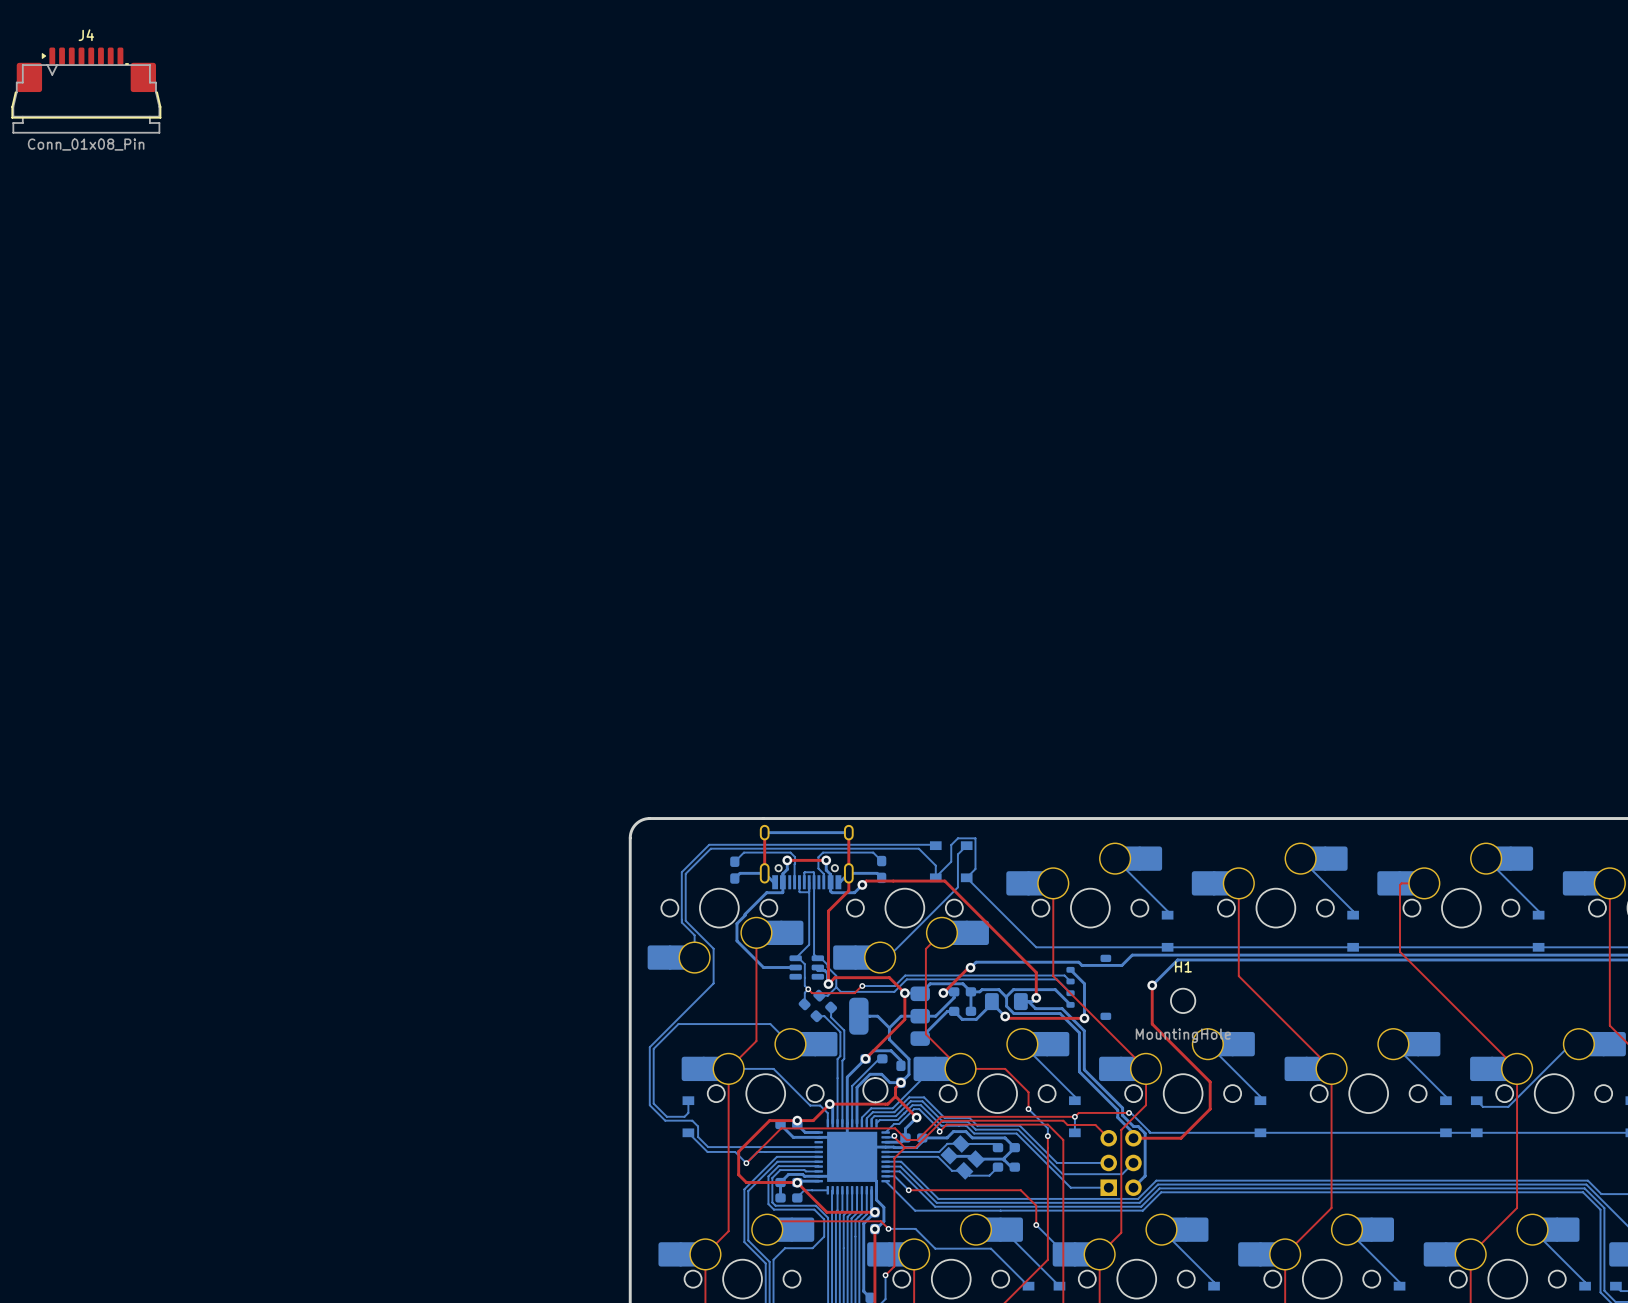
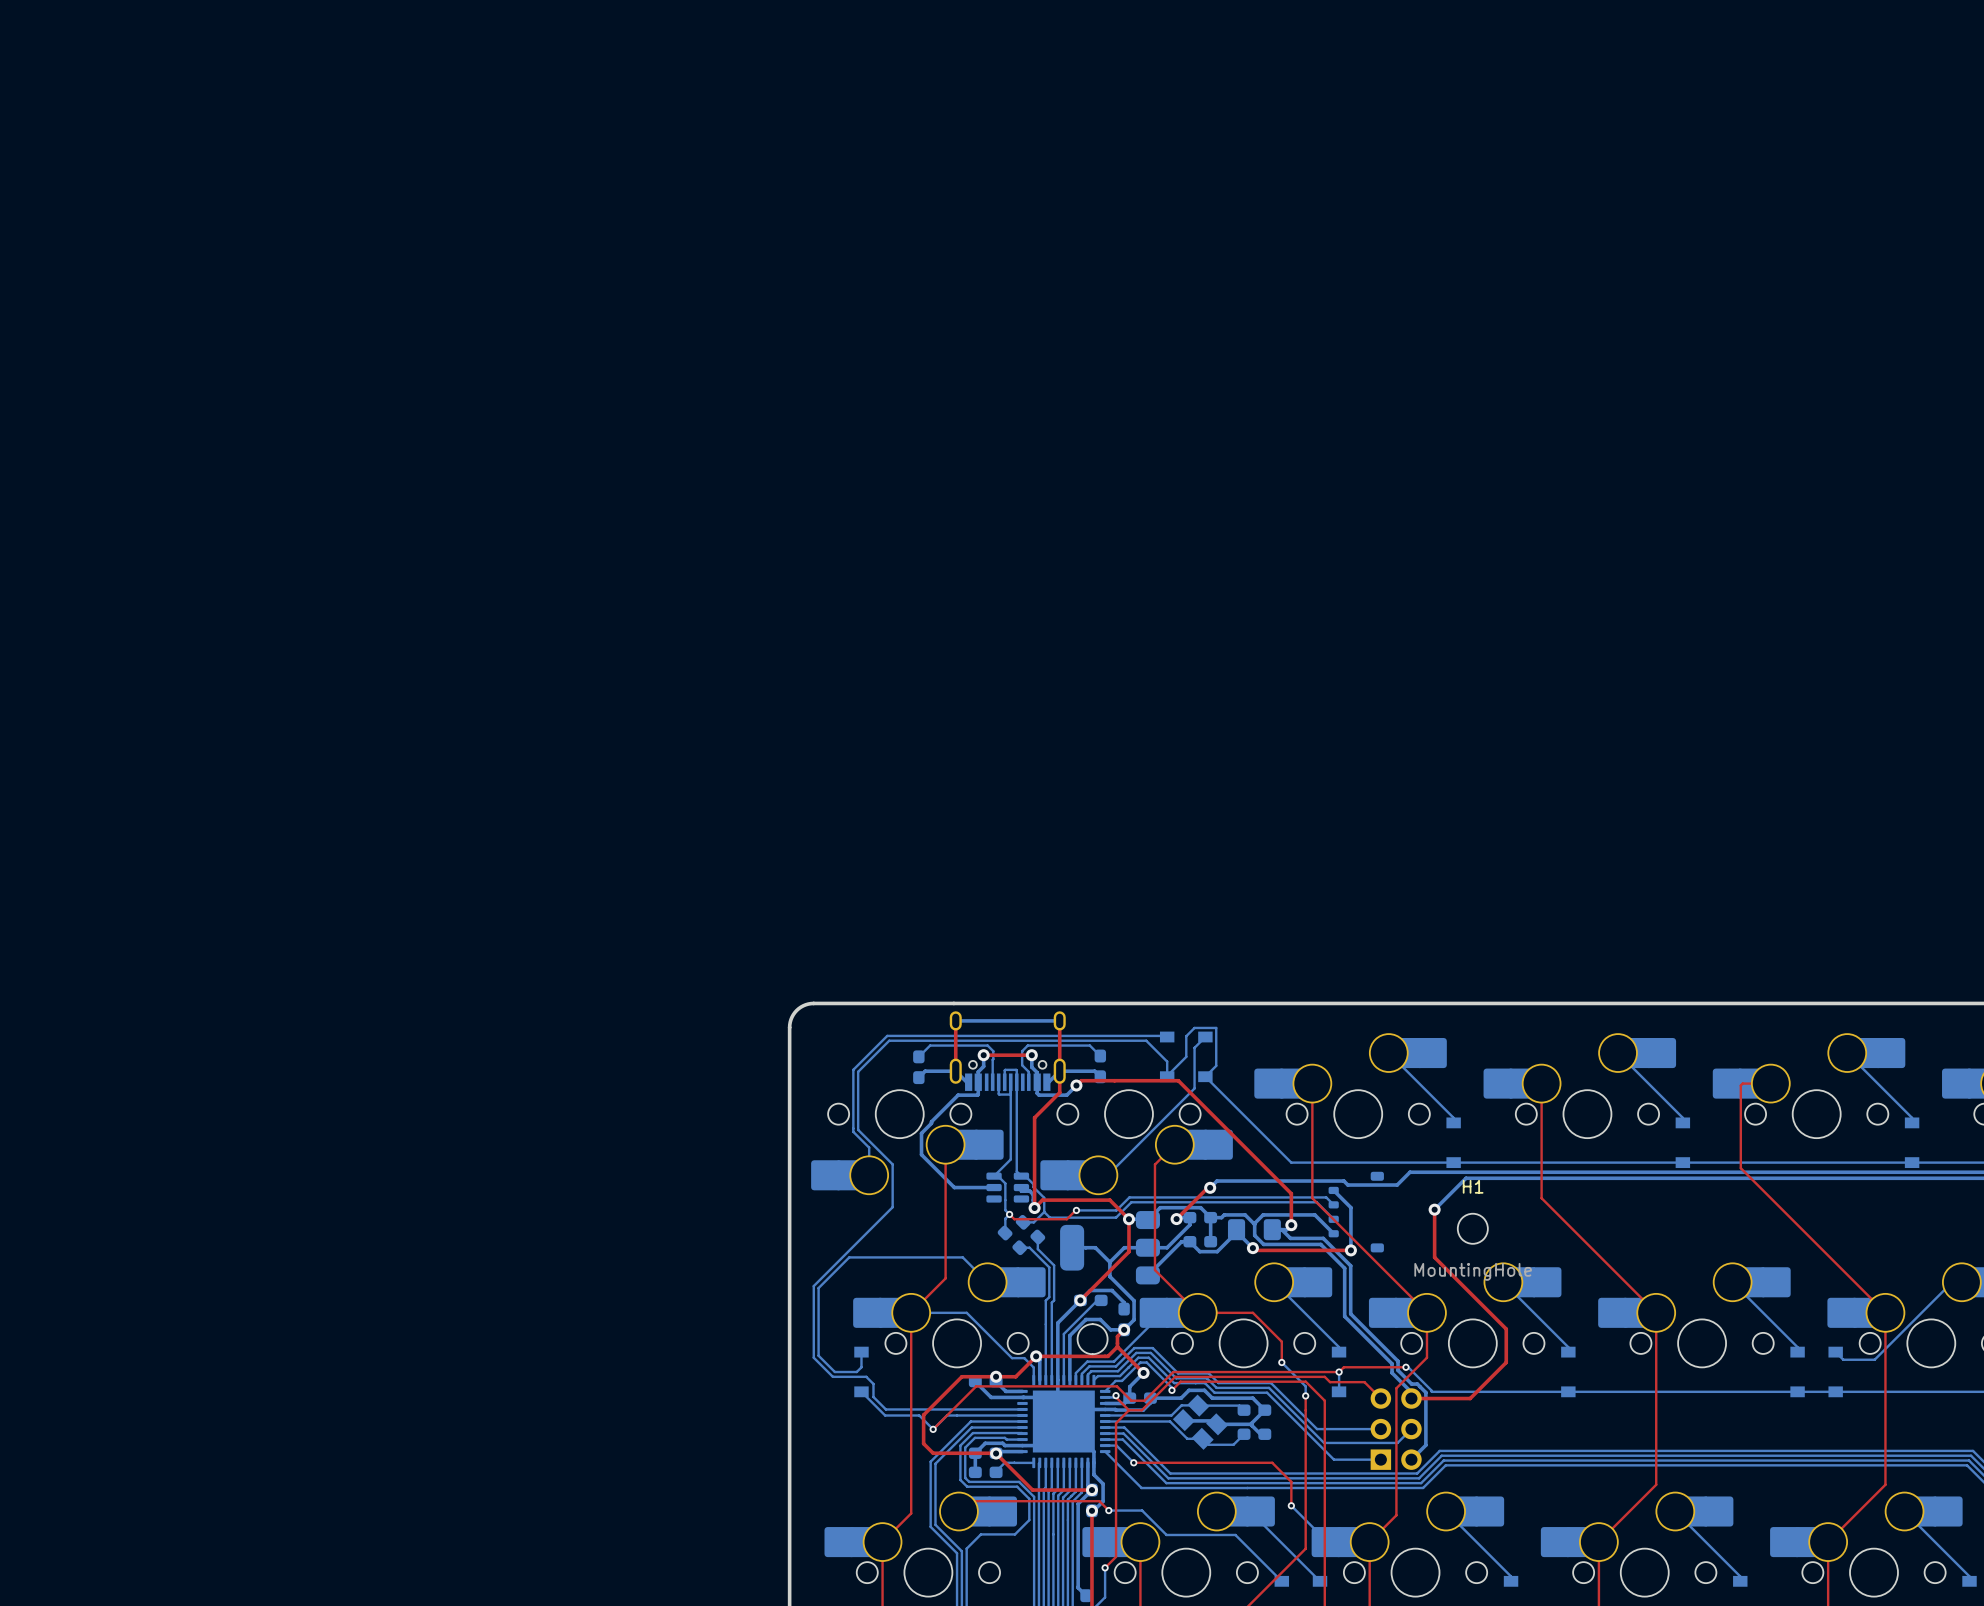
J4: Conn_01x08_Pin (86, 90) -> none

